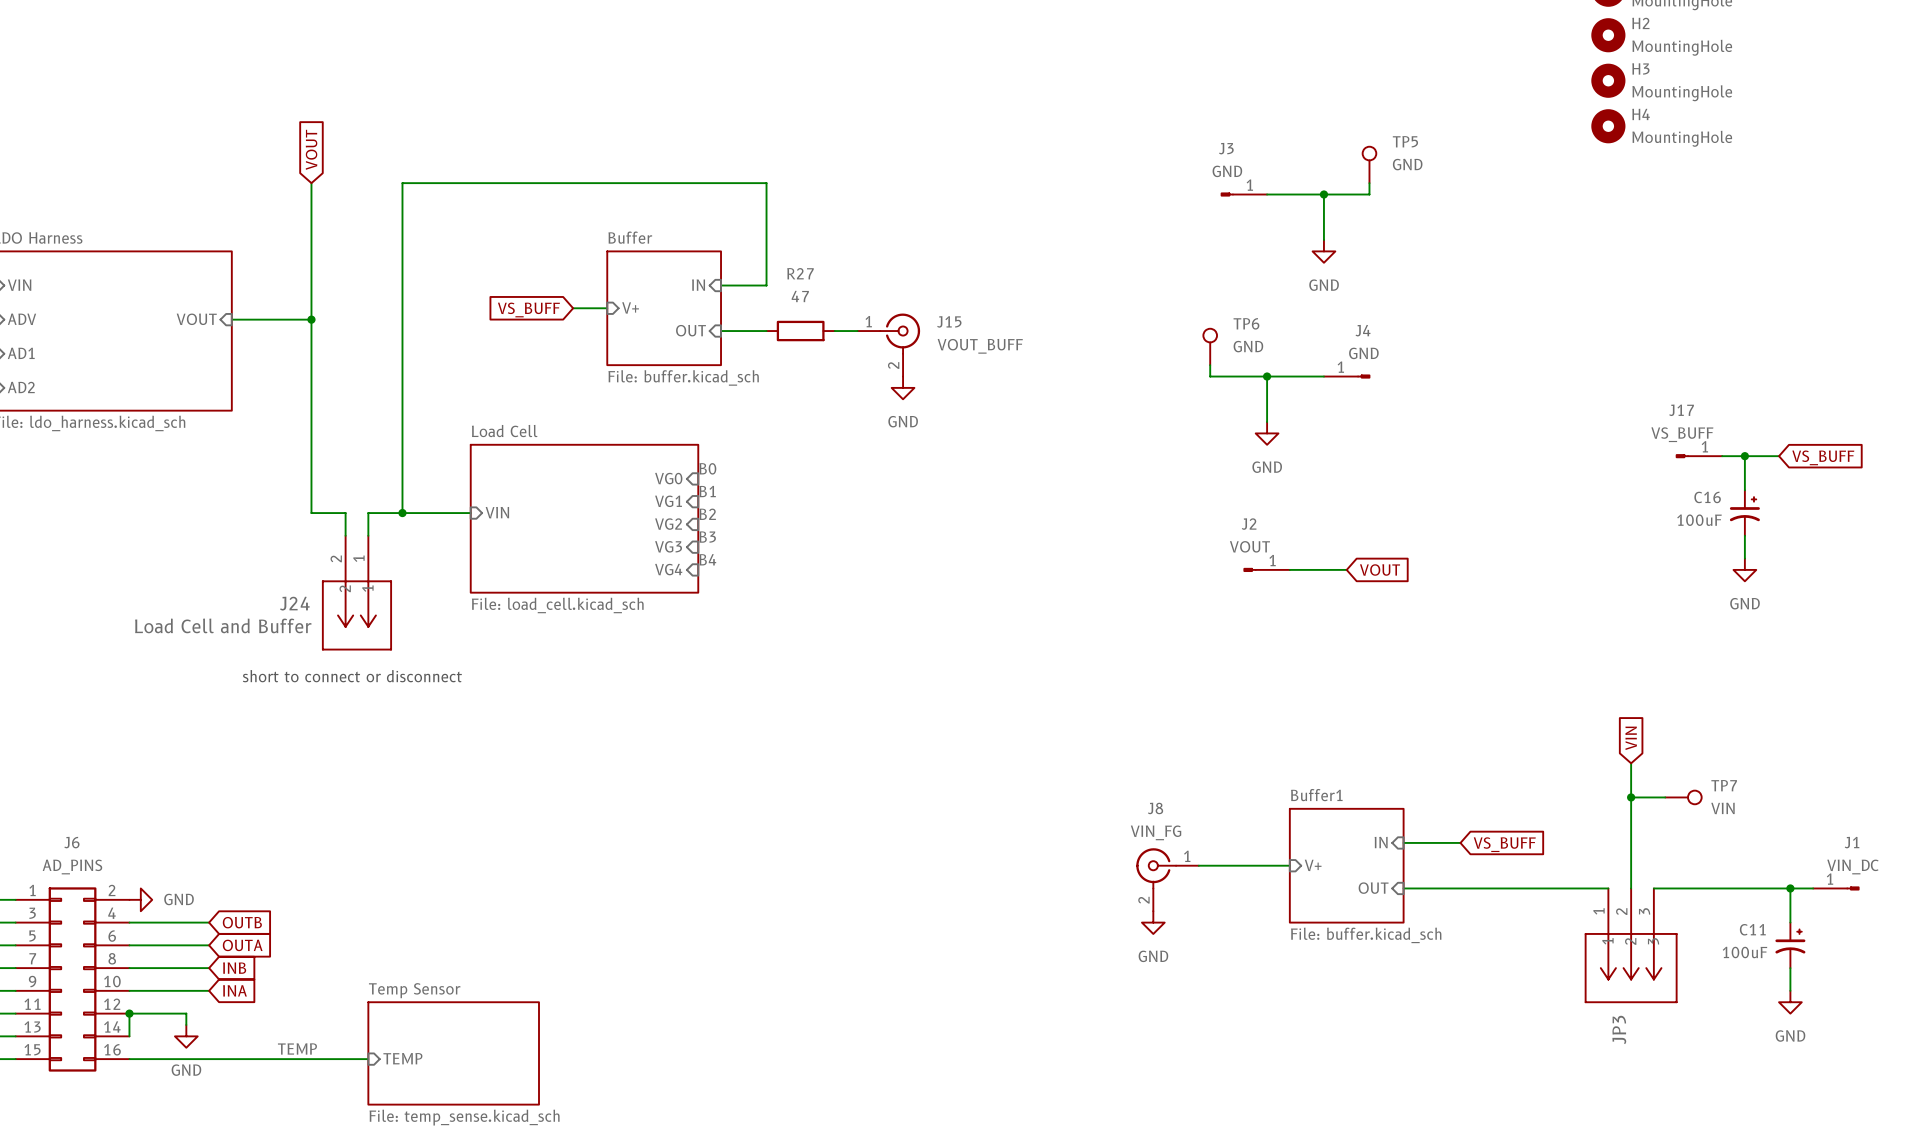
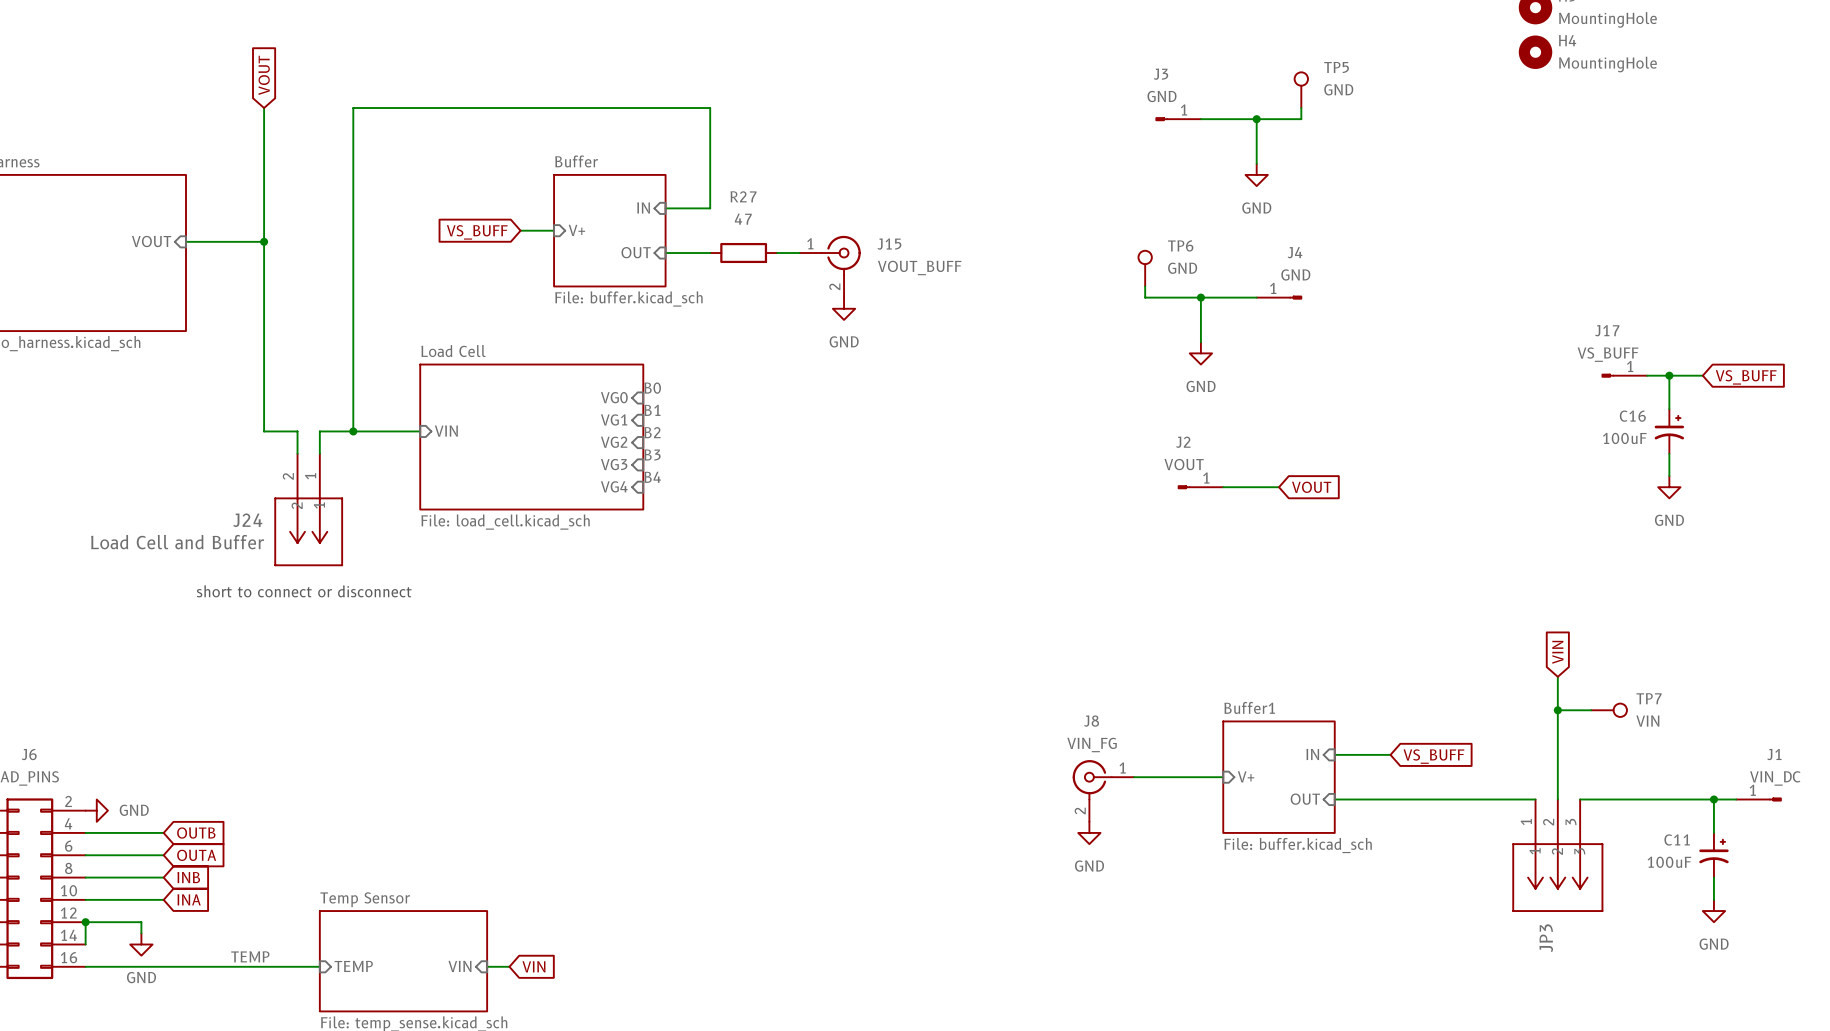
sheet pin: none -> VIN (459, 966)
wire: none -> (487, 966) (509, 966)
global label: none -> VIN (533, 966)

